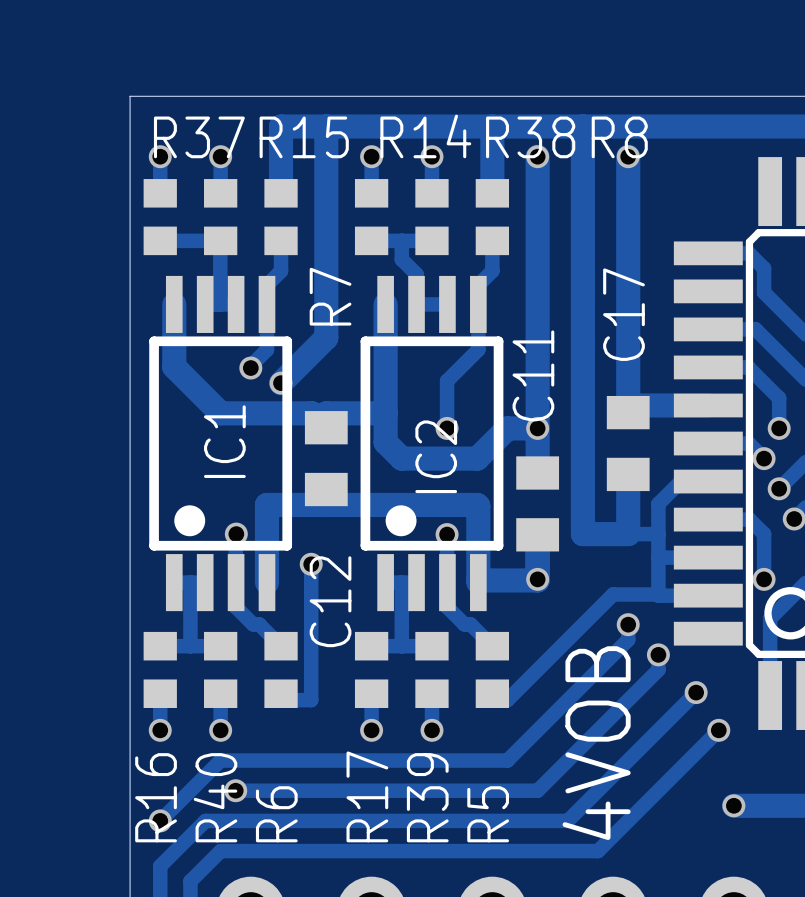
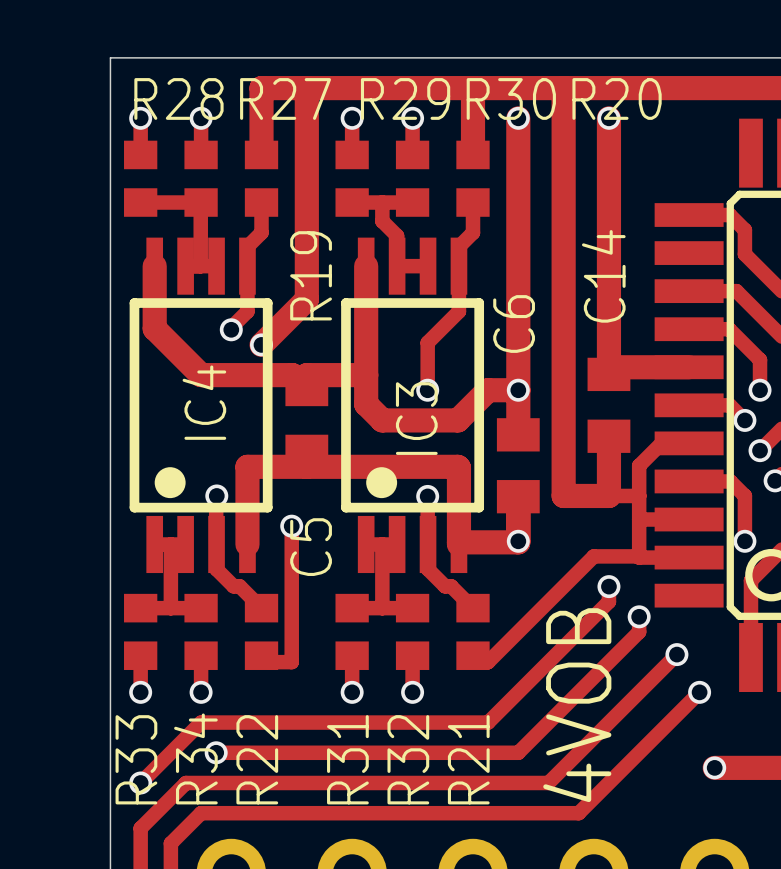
R14 name: R14 (425, 136) -> R29 (405, 98)
R37 name: R37 (199, 137) -> R28 (178, 98)
R15 name: R15 (304, 137) -> R27 (285, 98)
R38 name: R38 (530, 137) -> R30 (511, 98)
R8 name: R8 (619, 137) -> R20 (617, 98)
R7 name: R7 (330, 296) -> R19 (311, 275)
C17 name: C17 (623, 314) -> C14 (603, 276)
C11 name: C11 (533, 375) -> C6 (514, 324)
IC1 name: IC1 (224, 441) -> IC4 (204, 402)
IC2 name: IC2 (436, 456) -> IC3 (416, 418)
C12 name: C12 (330, 601) -> C5 (311, 547)
R17 name: R17 (367, 796) -> R31 (347, 759)
R16 name: R16 (156, 797) -> R33 (136, 759)
R40 name: R40 (215, 797) -> R34 (195, 758)
R39 name: R39 (427, 797) -> R32 (408, 759)
R6 name: R6 (276, 814) -> R22 (257, 759)
R5 name: R5 (488, 814) -> R21 (468, 759)

